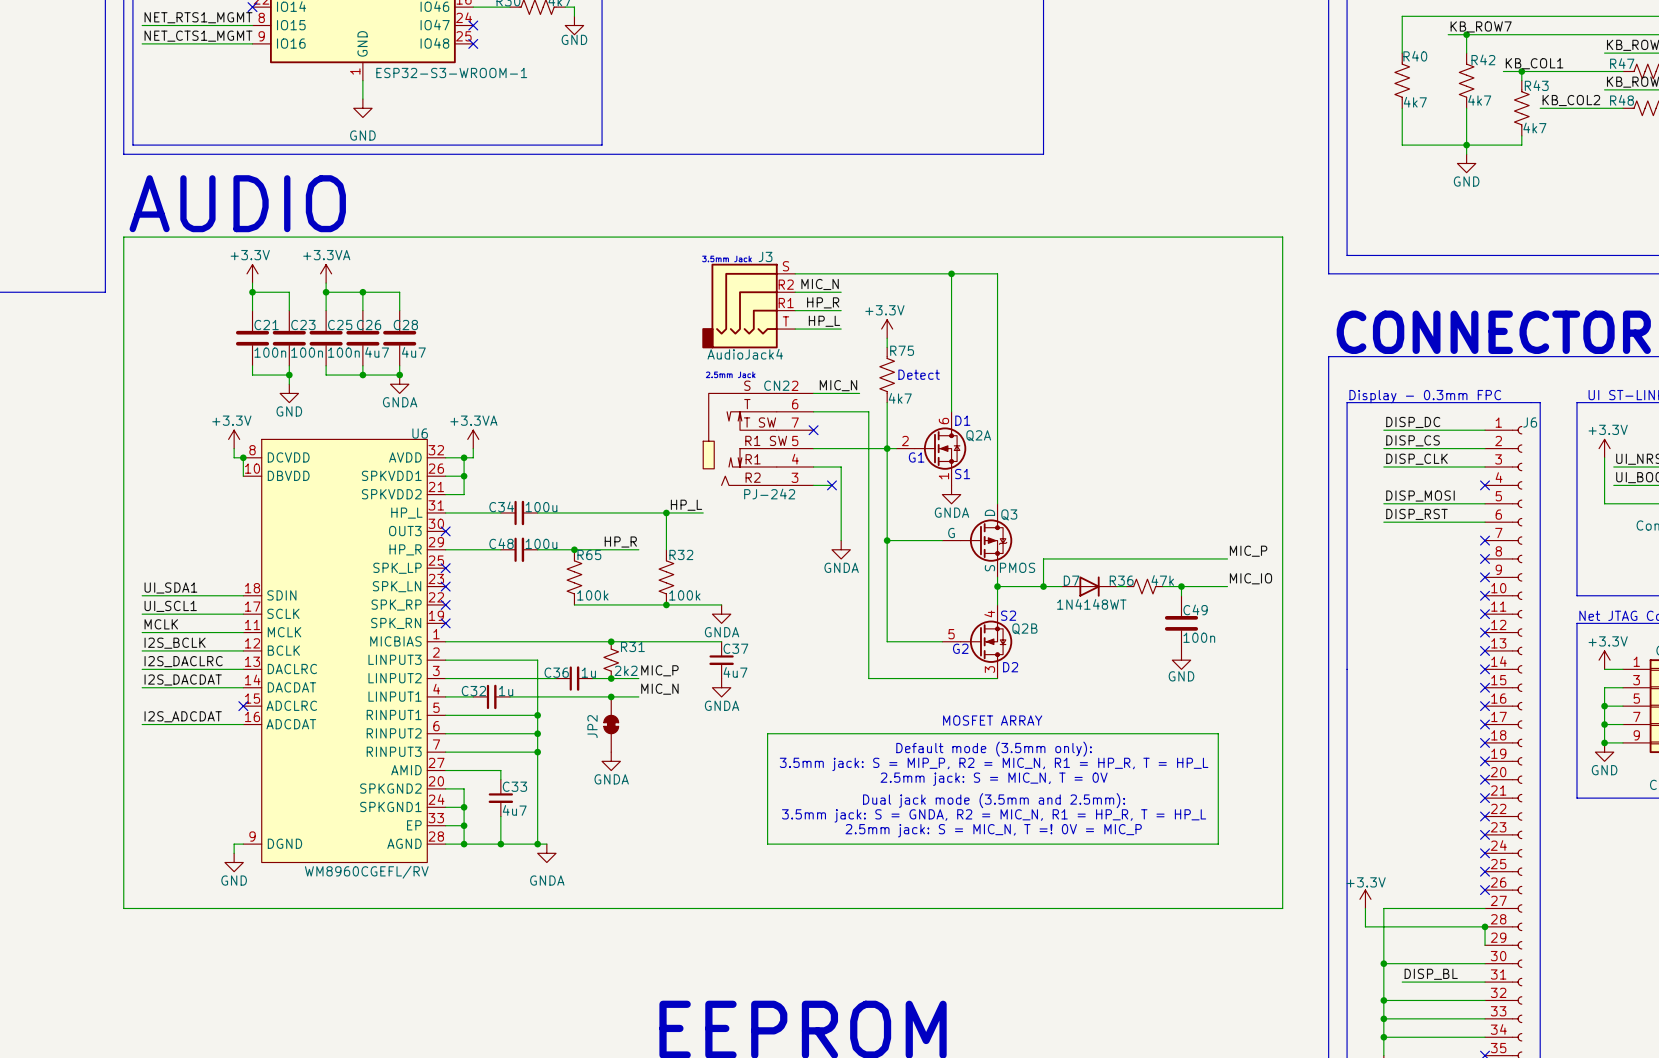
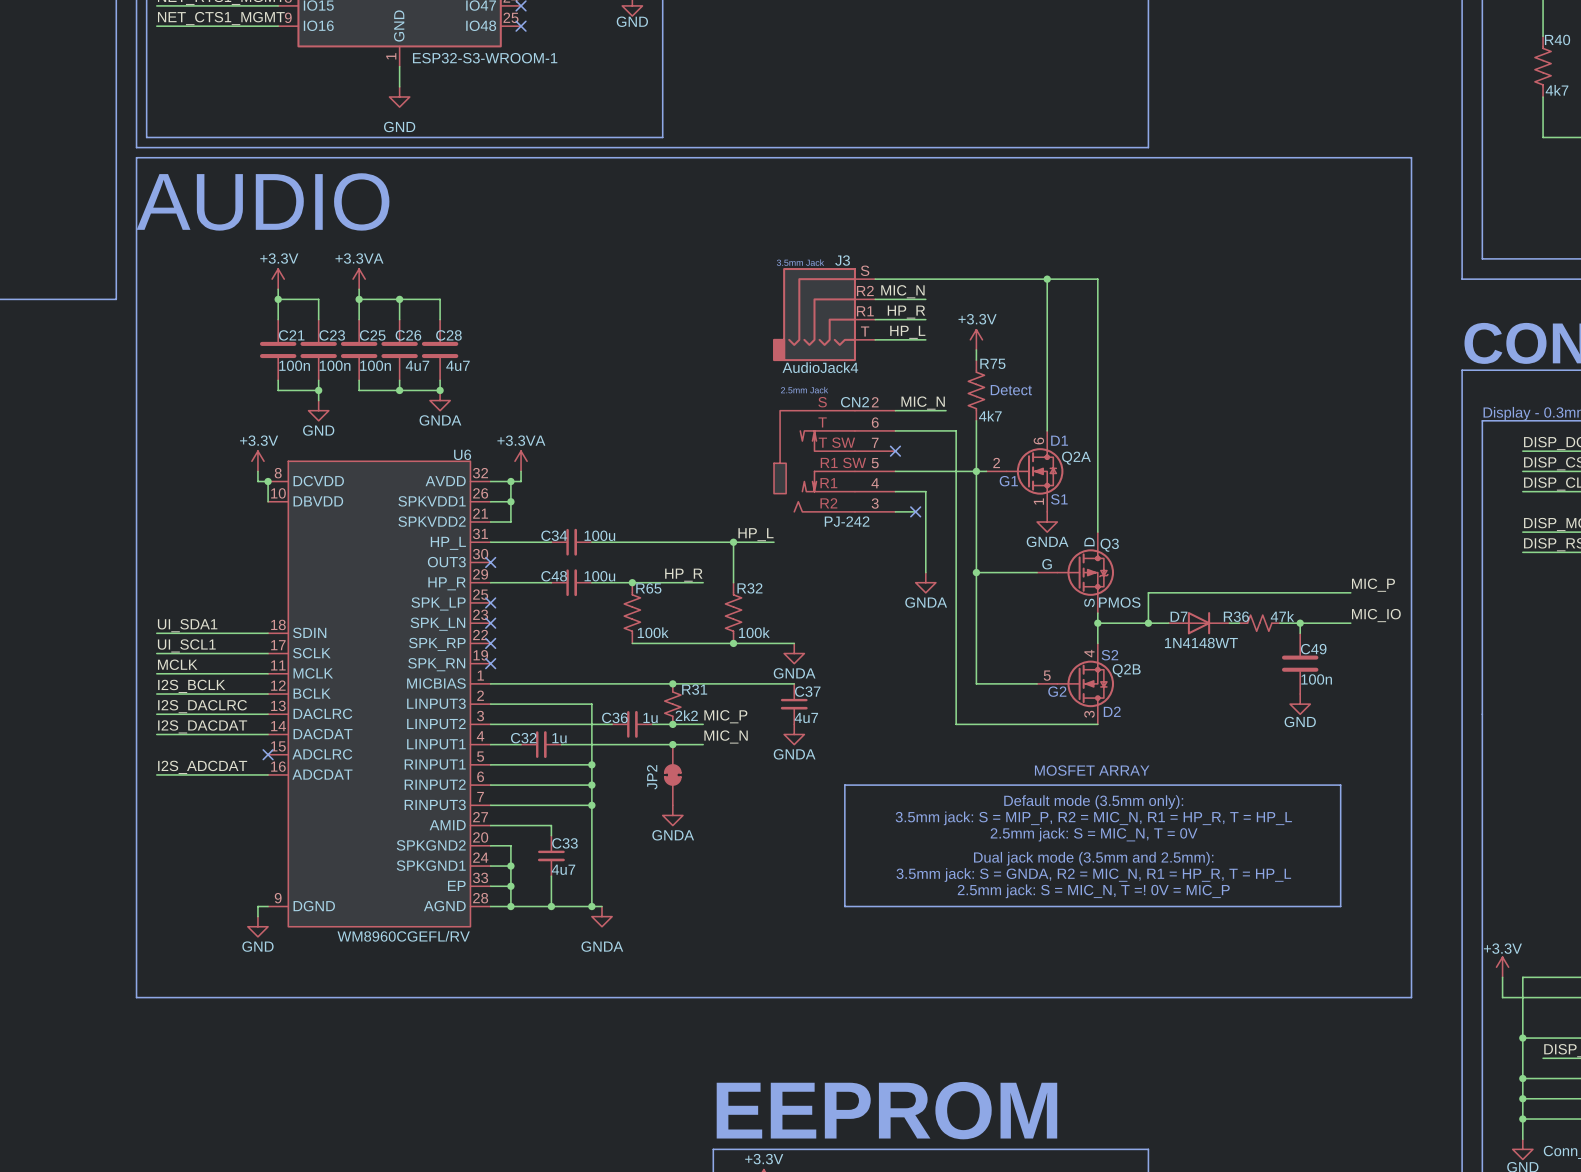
line: none -> (136, 157) (1411, 157) (1411, 997) (136, 997) (136, 157)
wire: (123, 237) (1282, 237) (1282, 908) (123, 908) (123, 237) -> none
line: none -> (844, 785) (1340, 785) (1340, 906) (844, 906) (844, 785)

